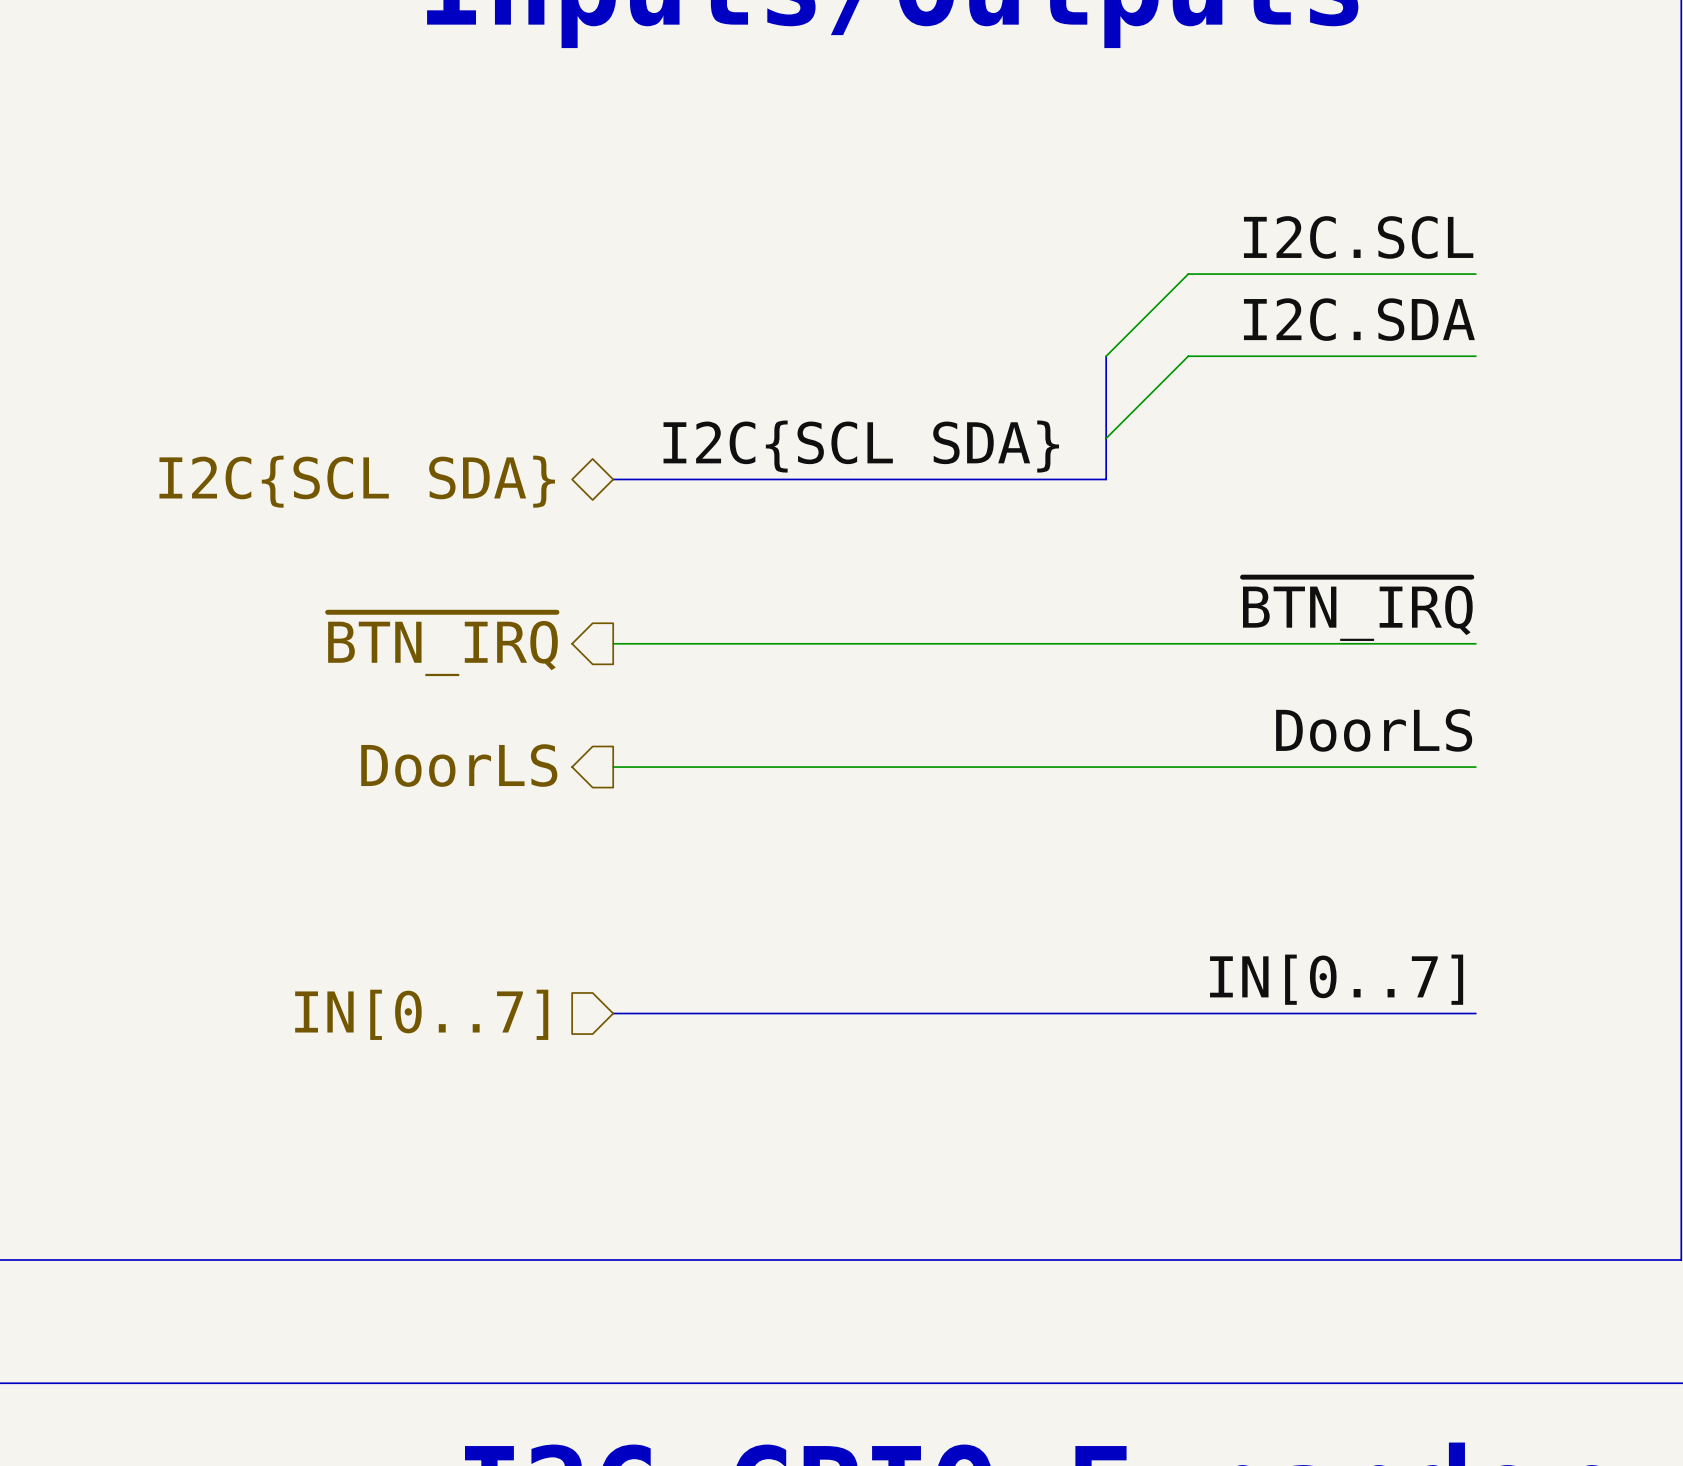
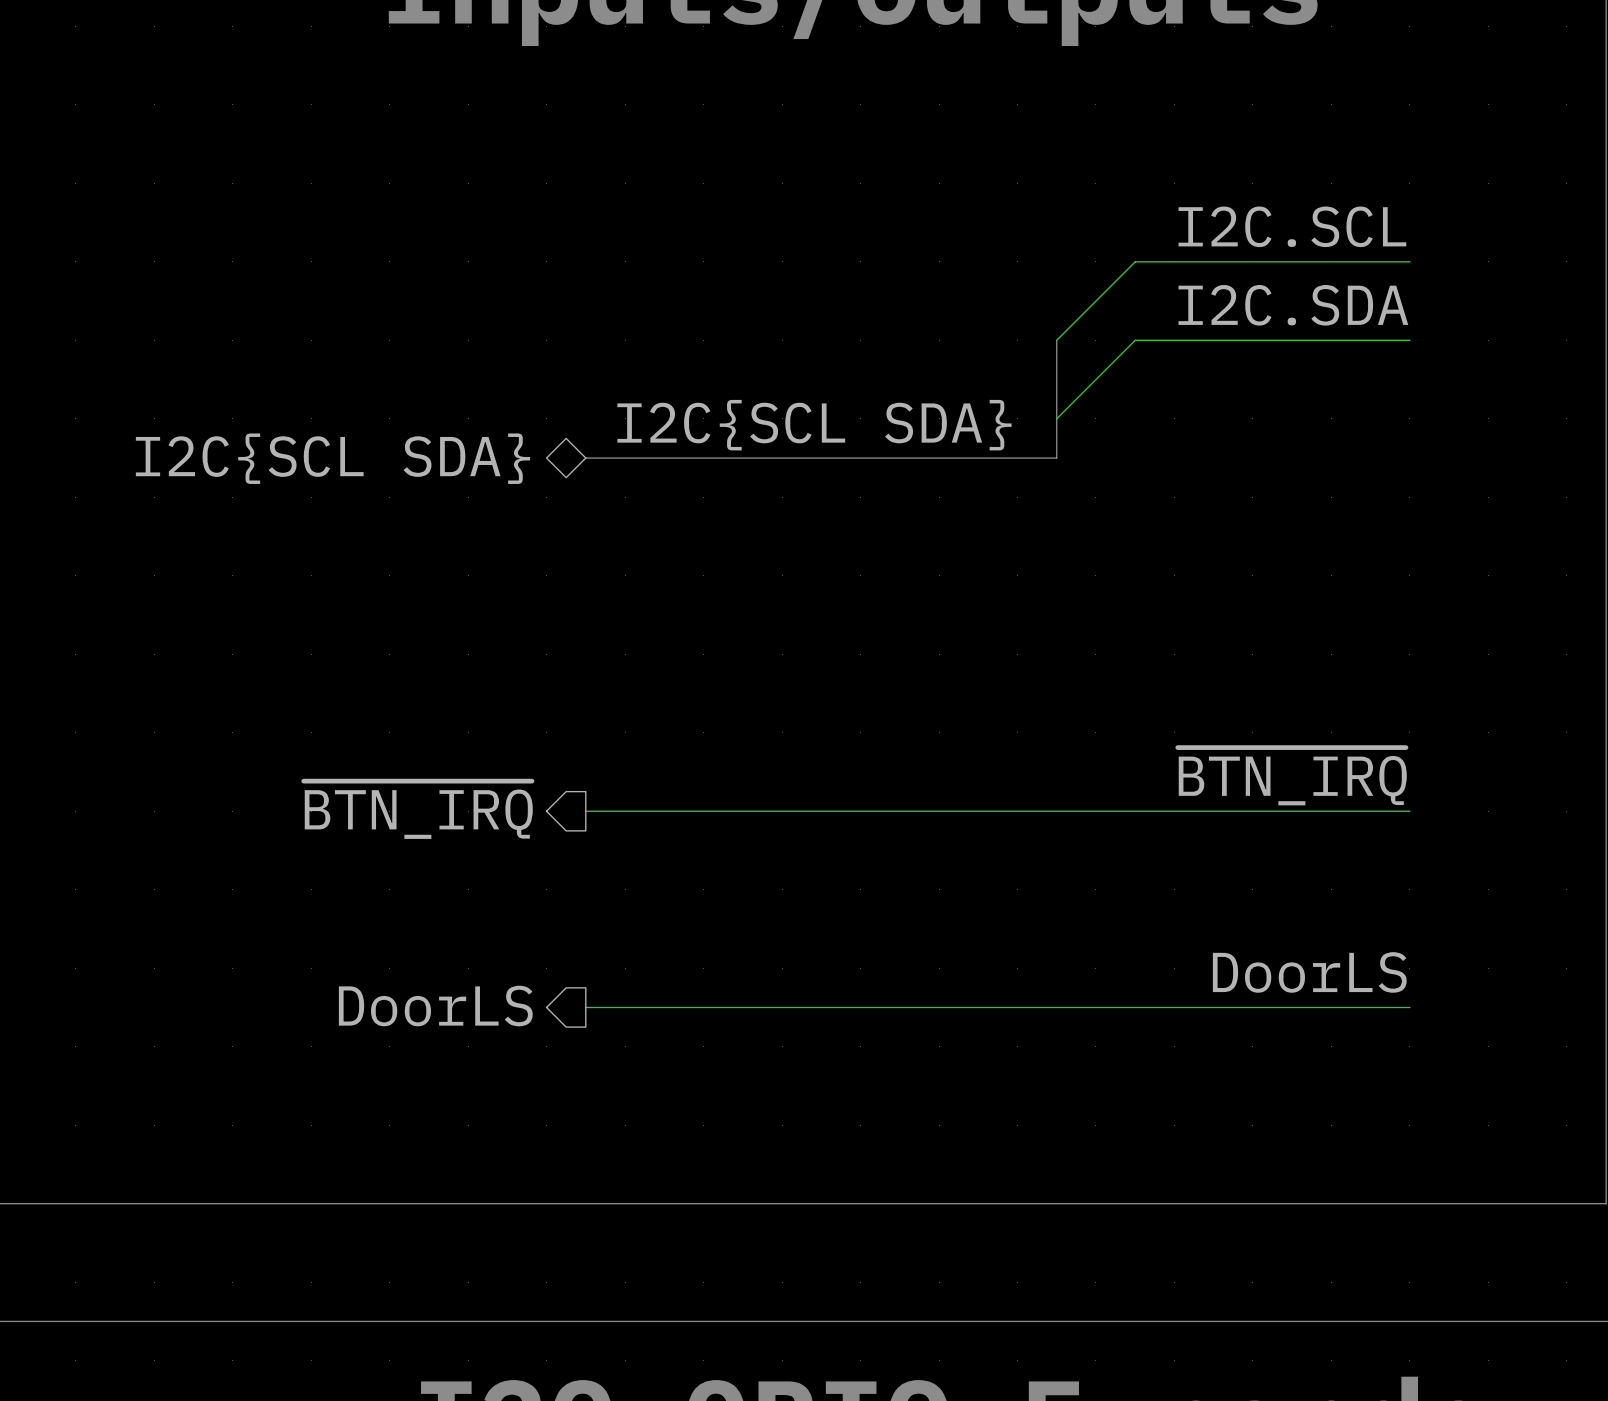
label position: ~{BTN_IRQ} (1357, 609) -> ~{BTN_IRQ} (1292, 776)
wire: (613, 643) (1475, 643) -> (585, 1007) (1409, 1007)
hierarchical label position: ~{BTN_IRQ} (442, 644) -> ~{BTN_IRQ} (418, 810)
label position: DoorLS (1374, 730) -> DoorLS (1309, 972)
hierarchical label position: DoorLS (459, 765) -> DoorLS (435, 1006)
wire: (613, 767) (1475, 767) -> (585, 811) (1409, 811)
label: IN[0..7] (1336, 979) -> none
bus: (613, 1013) (1475, 1013) -> none
hierarchical label: IN[0..7] (421, 1014) -> none

